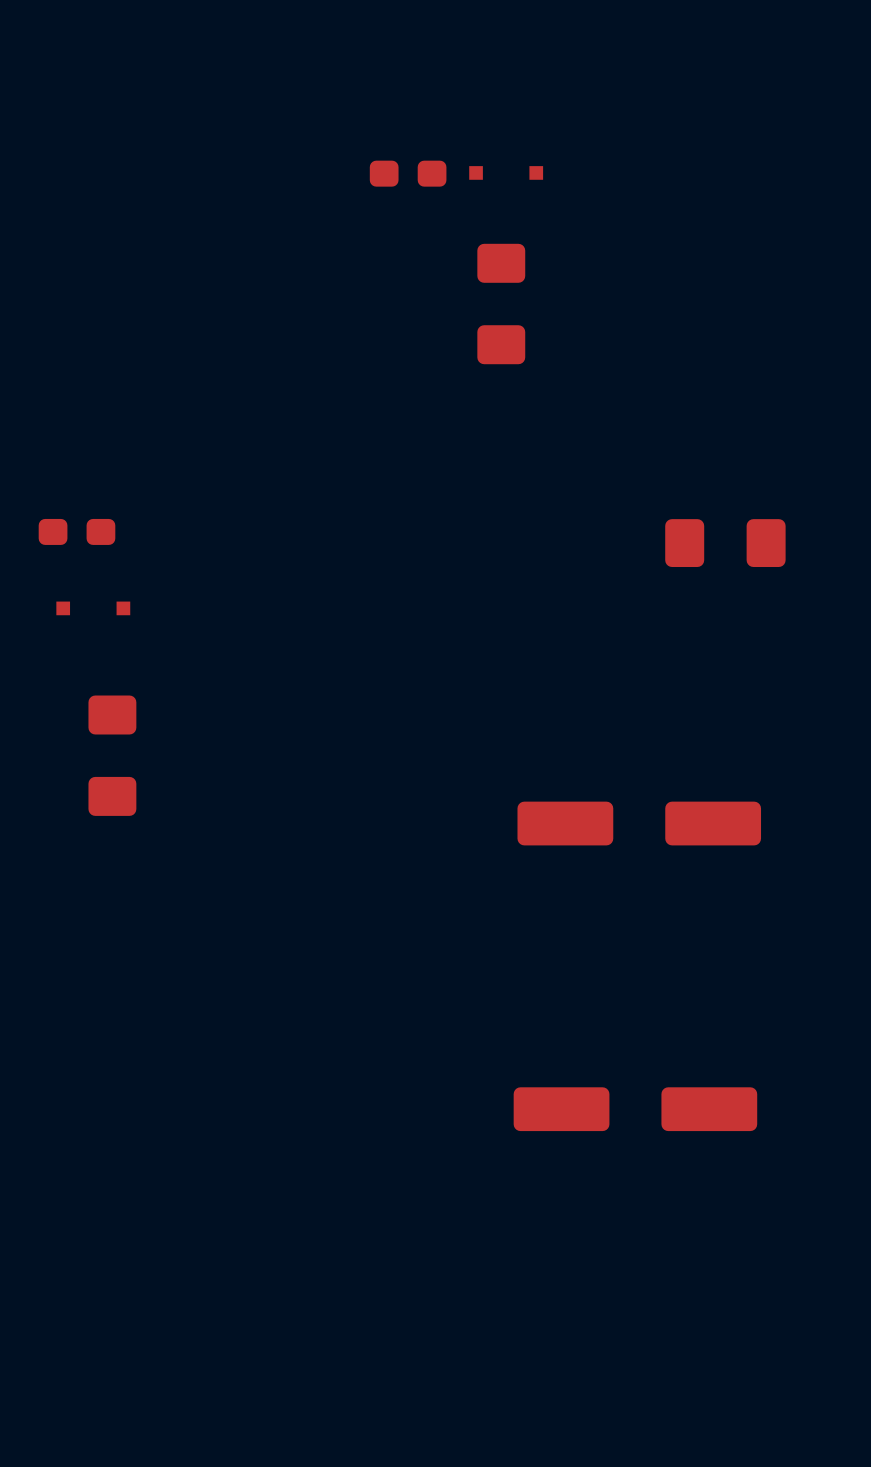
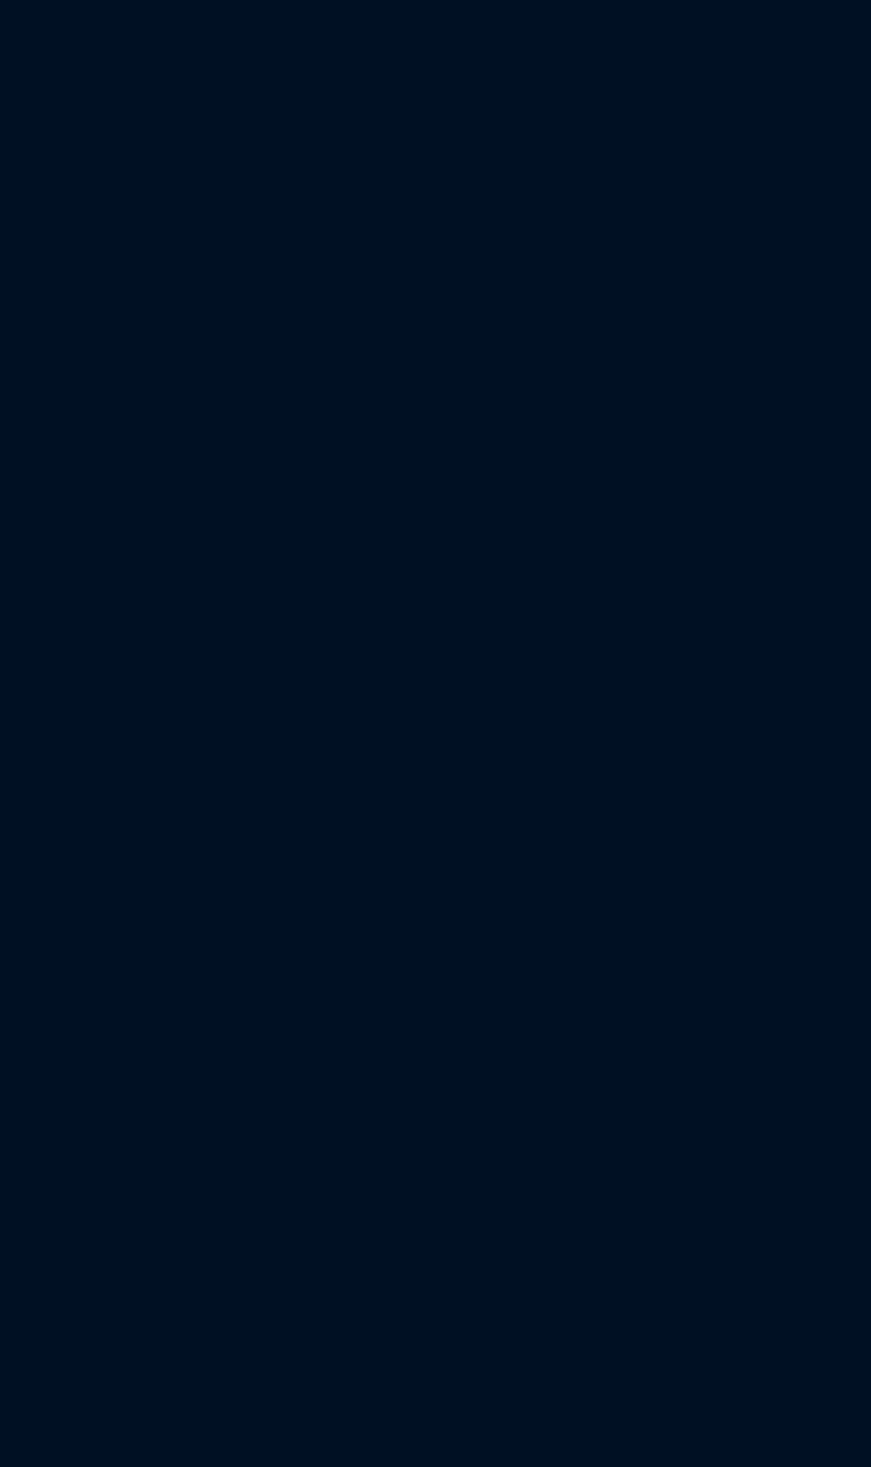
part: (506, 172) -> none
part: (408, 173) -> none
part: (501, 304) -> none
part: (77, 531) -> none
part: (725, 543) -> none
part: (93, 608) -> none
part: (112, 755) -> none
part: (639, 823) -> none
part: (635, 1109) -> none

